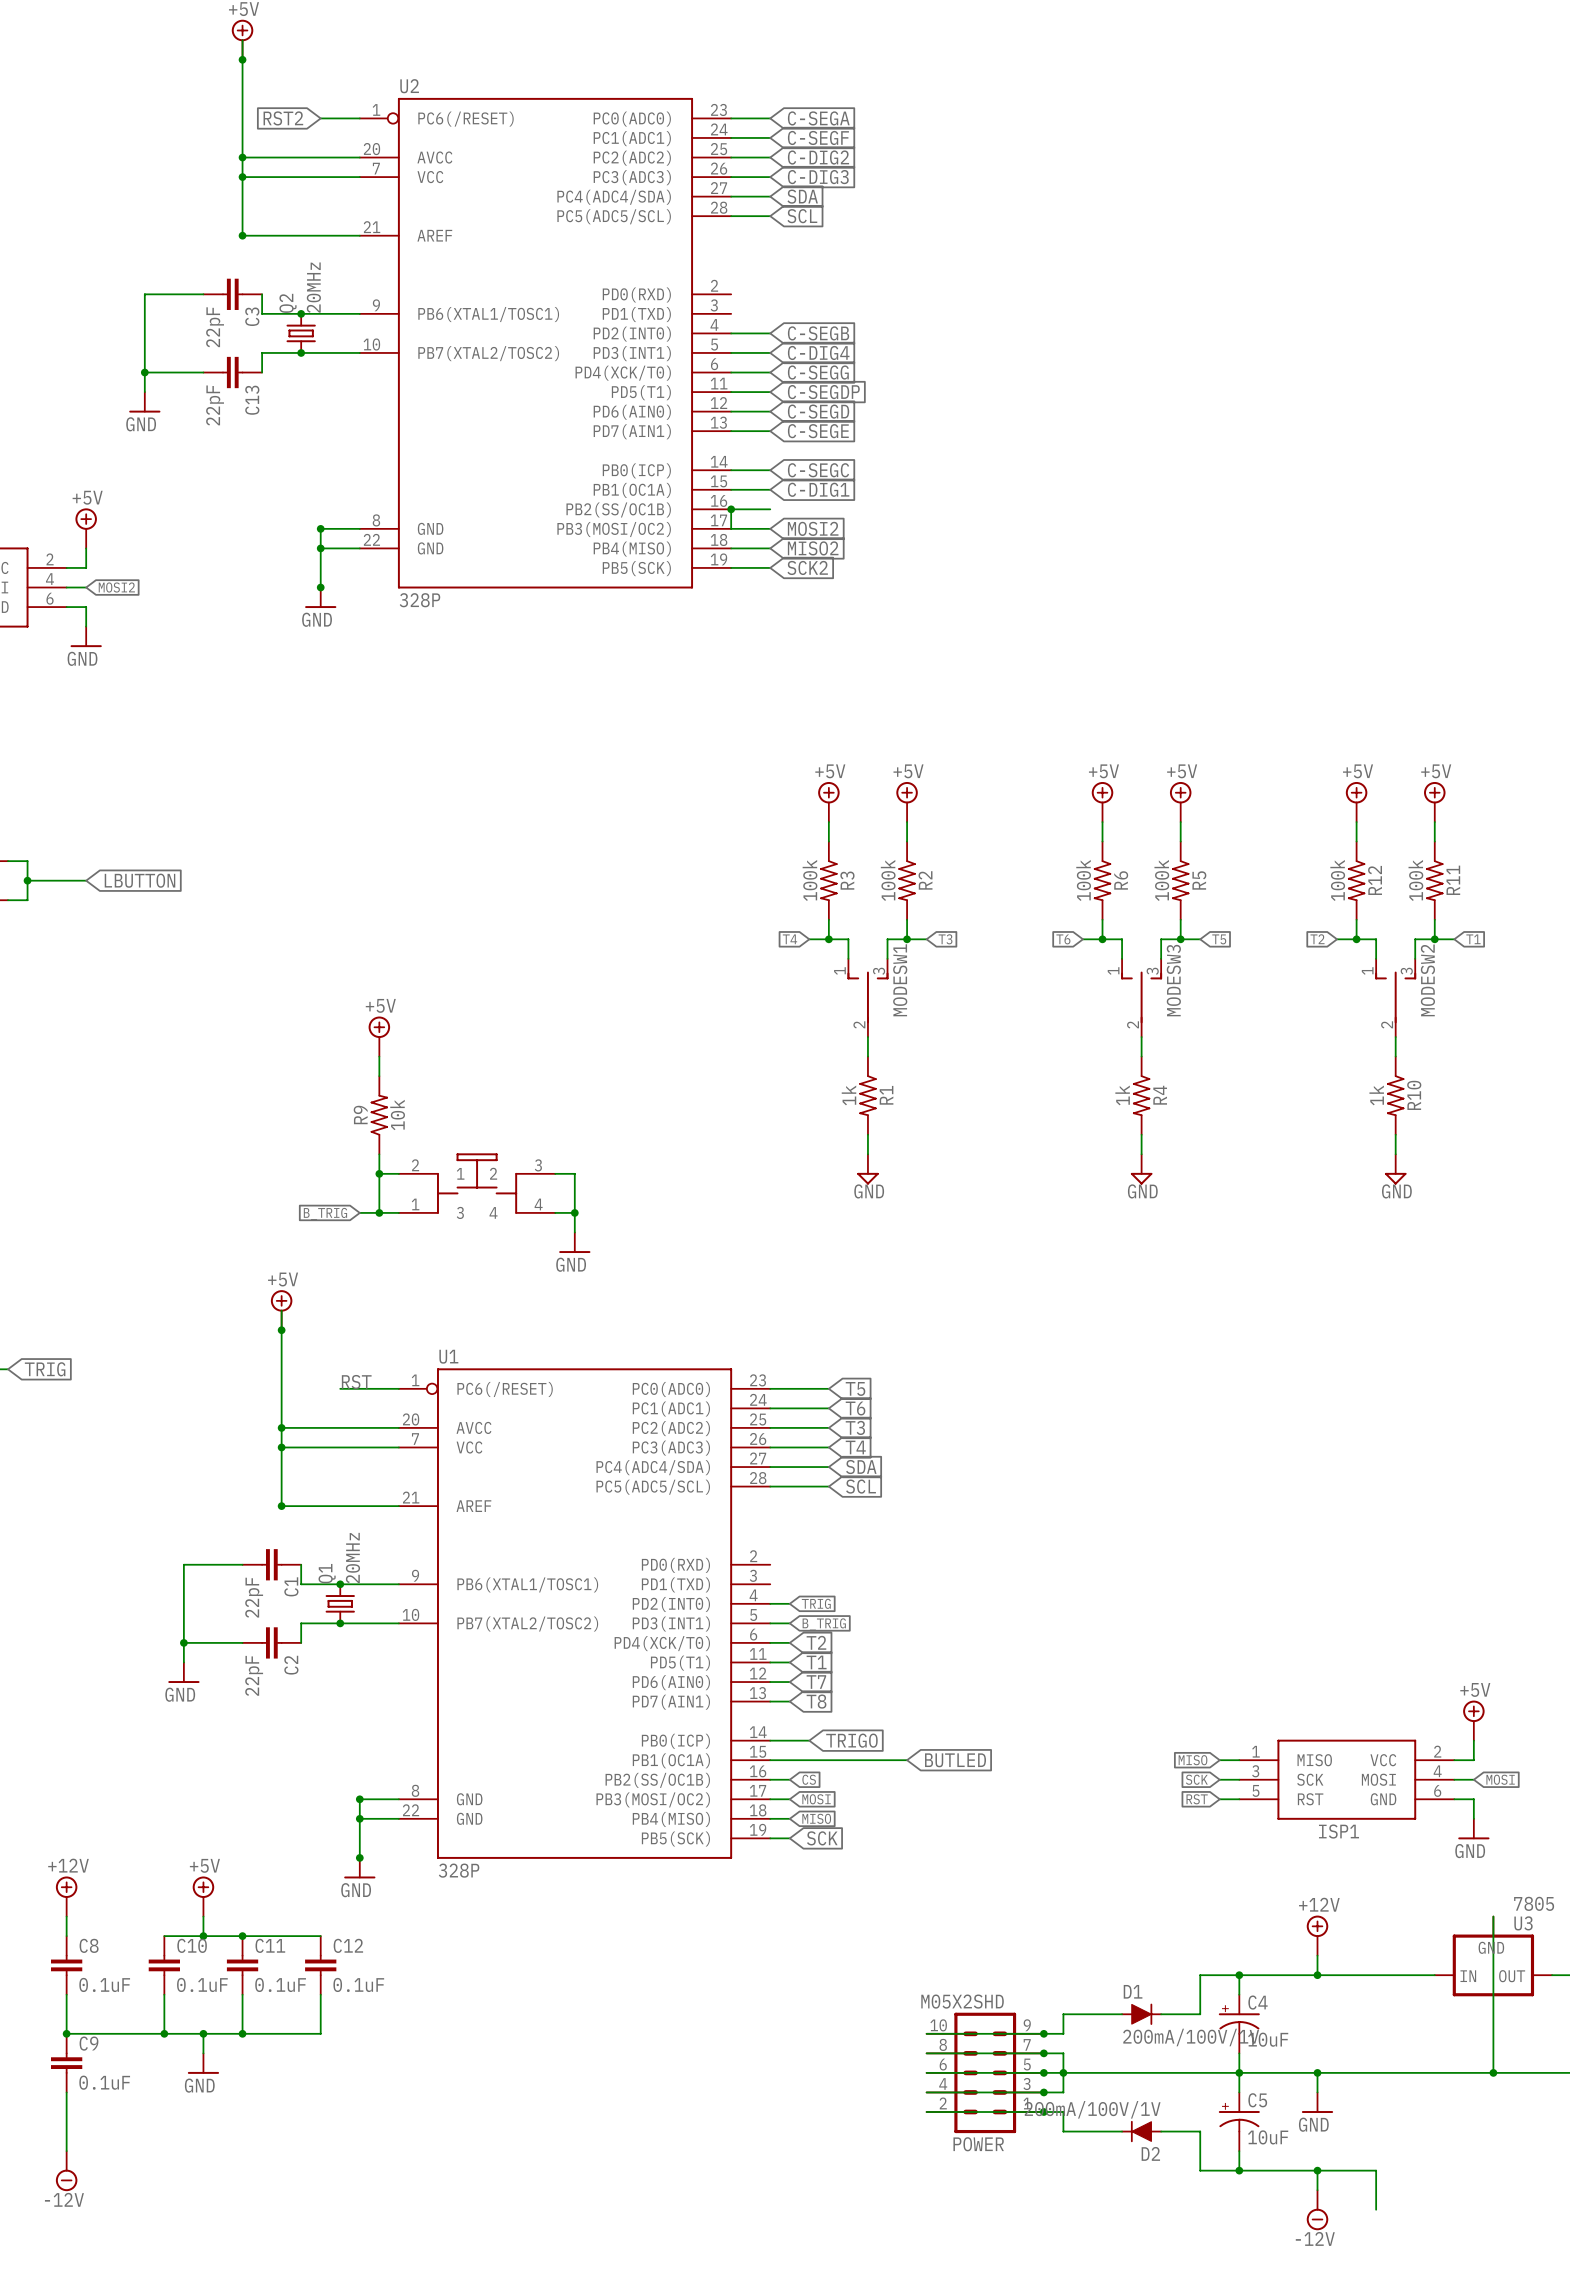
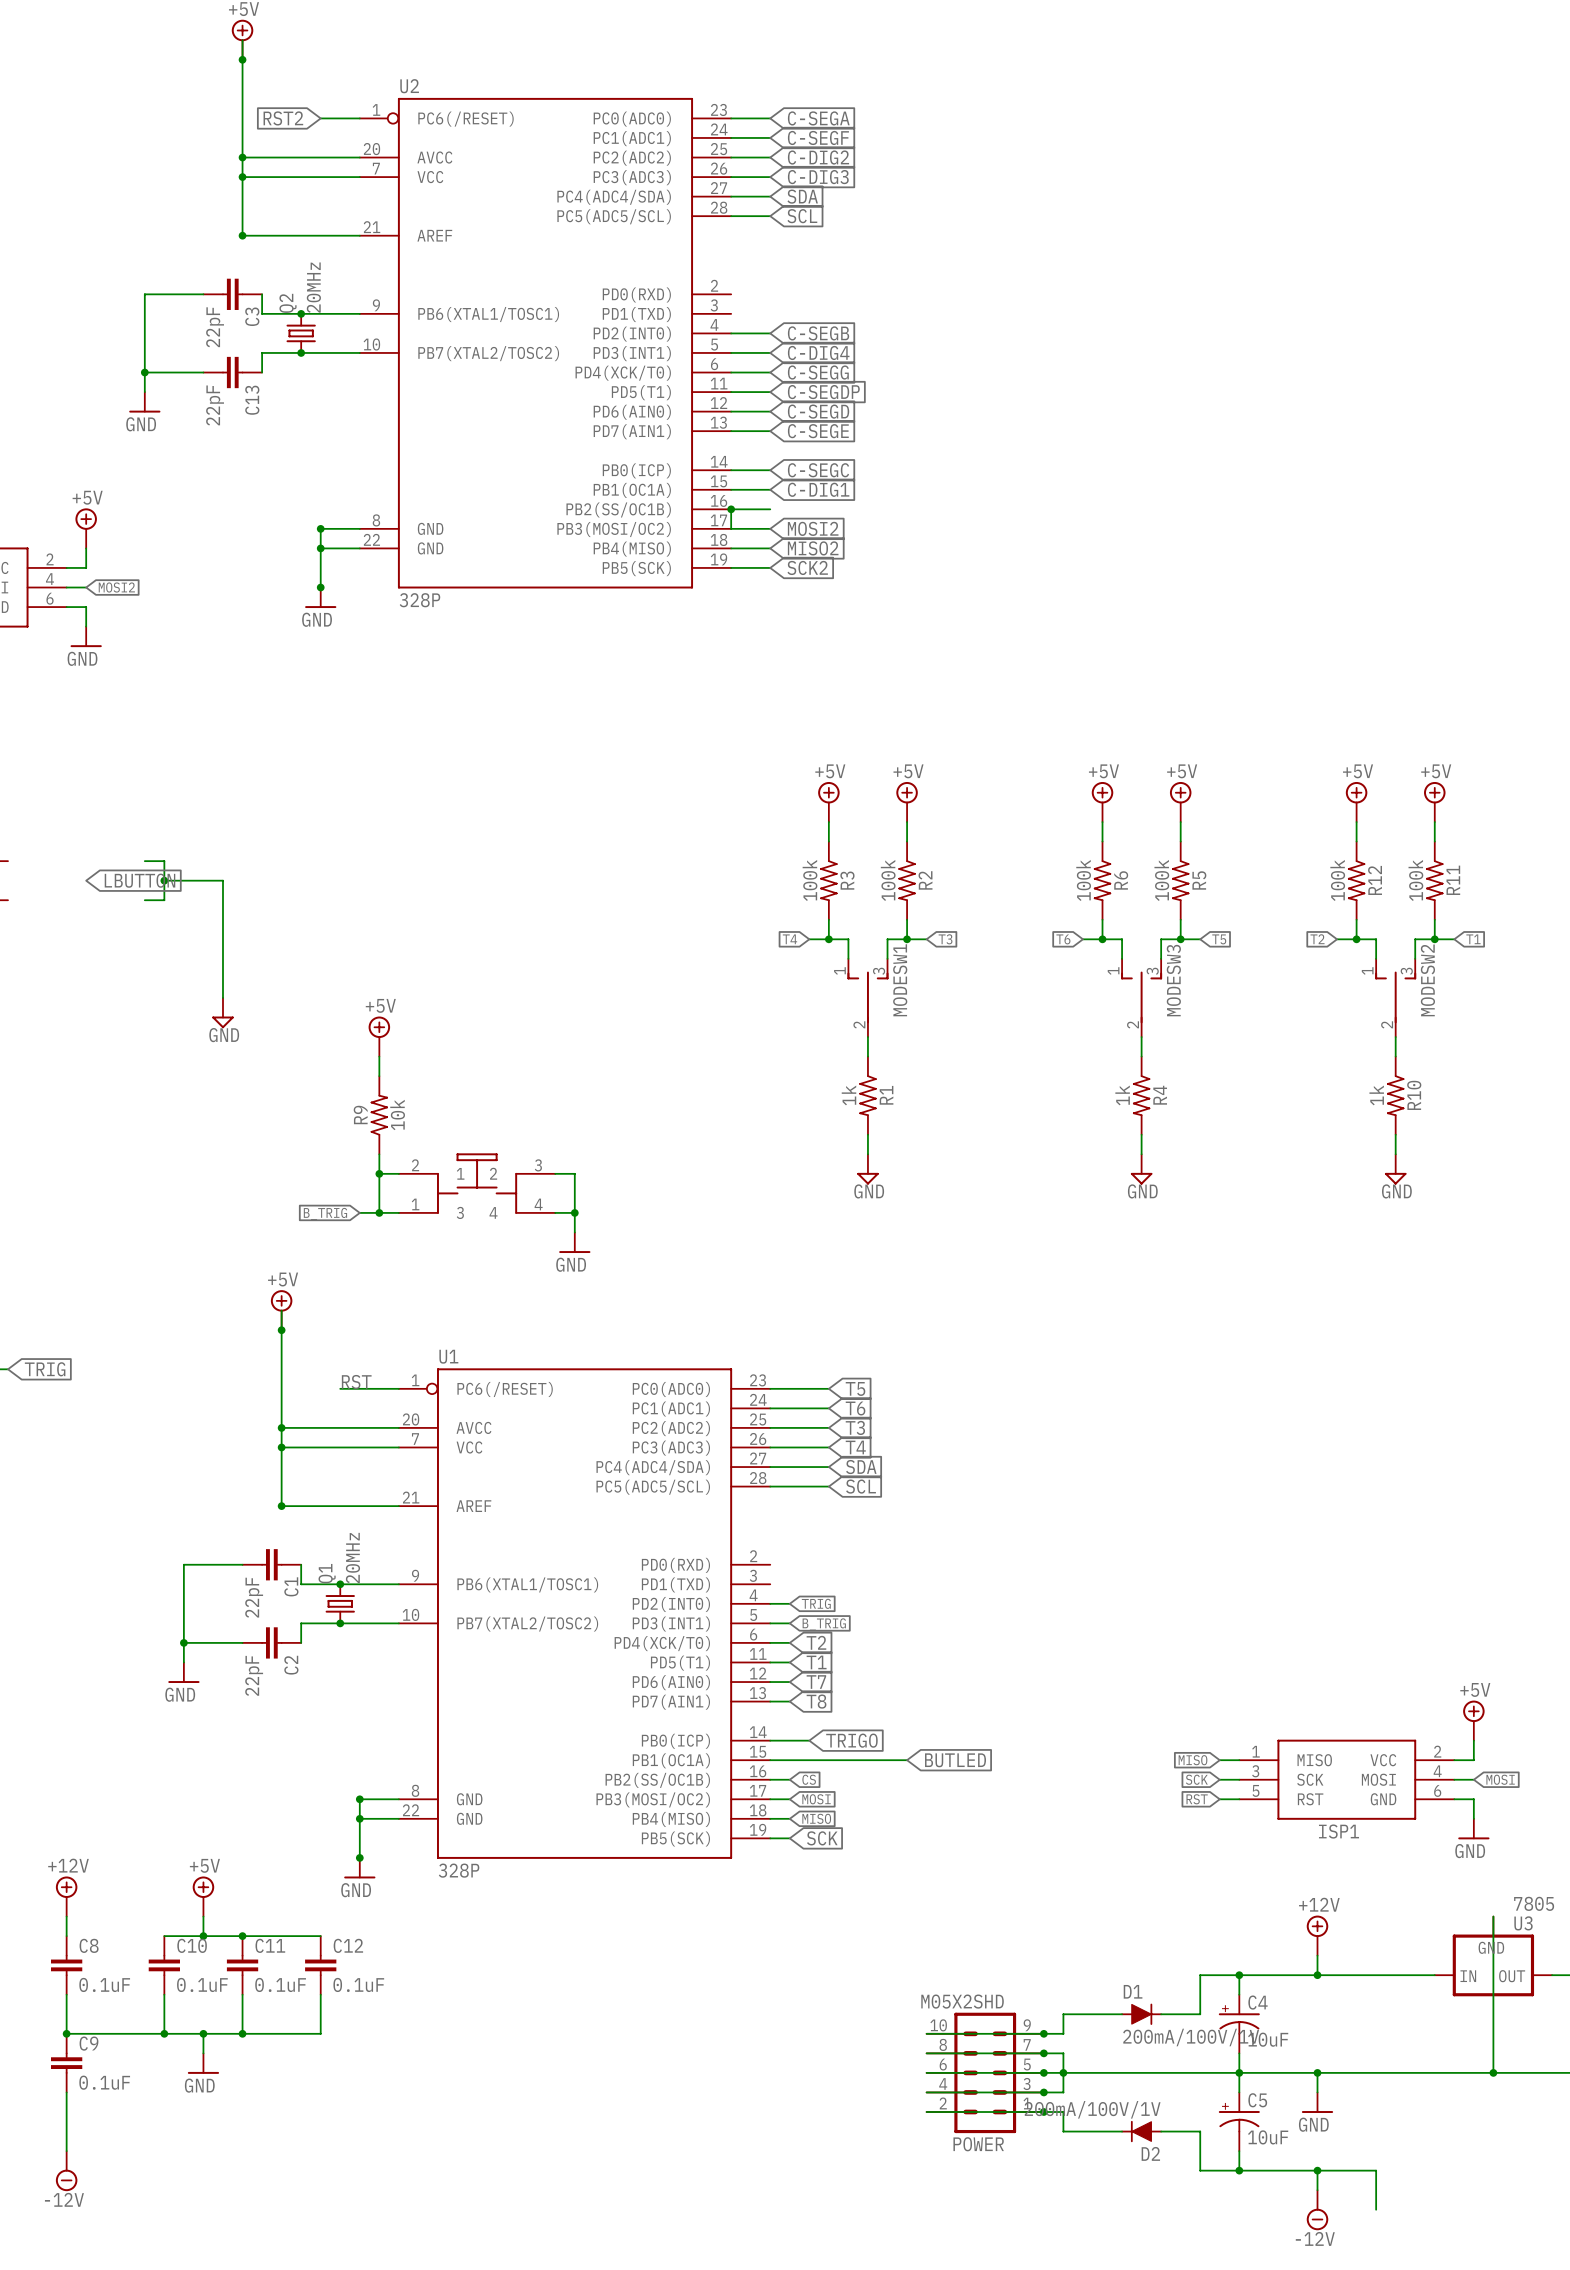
wire: (8, 861) (27, 861) (27, 900) (8, 900) -> (144, 861) (164, 861) (164, 900) (144, 900)
wire: (27, 880) (86, 880) -> none
junction: (27, 880) -> none
wire: none -> (164, 880) (222, 880) (222, 997)
junction: none -> (164, 880)
power symbol: none -> GND (222, 1013)

